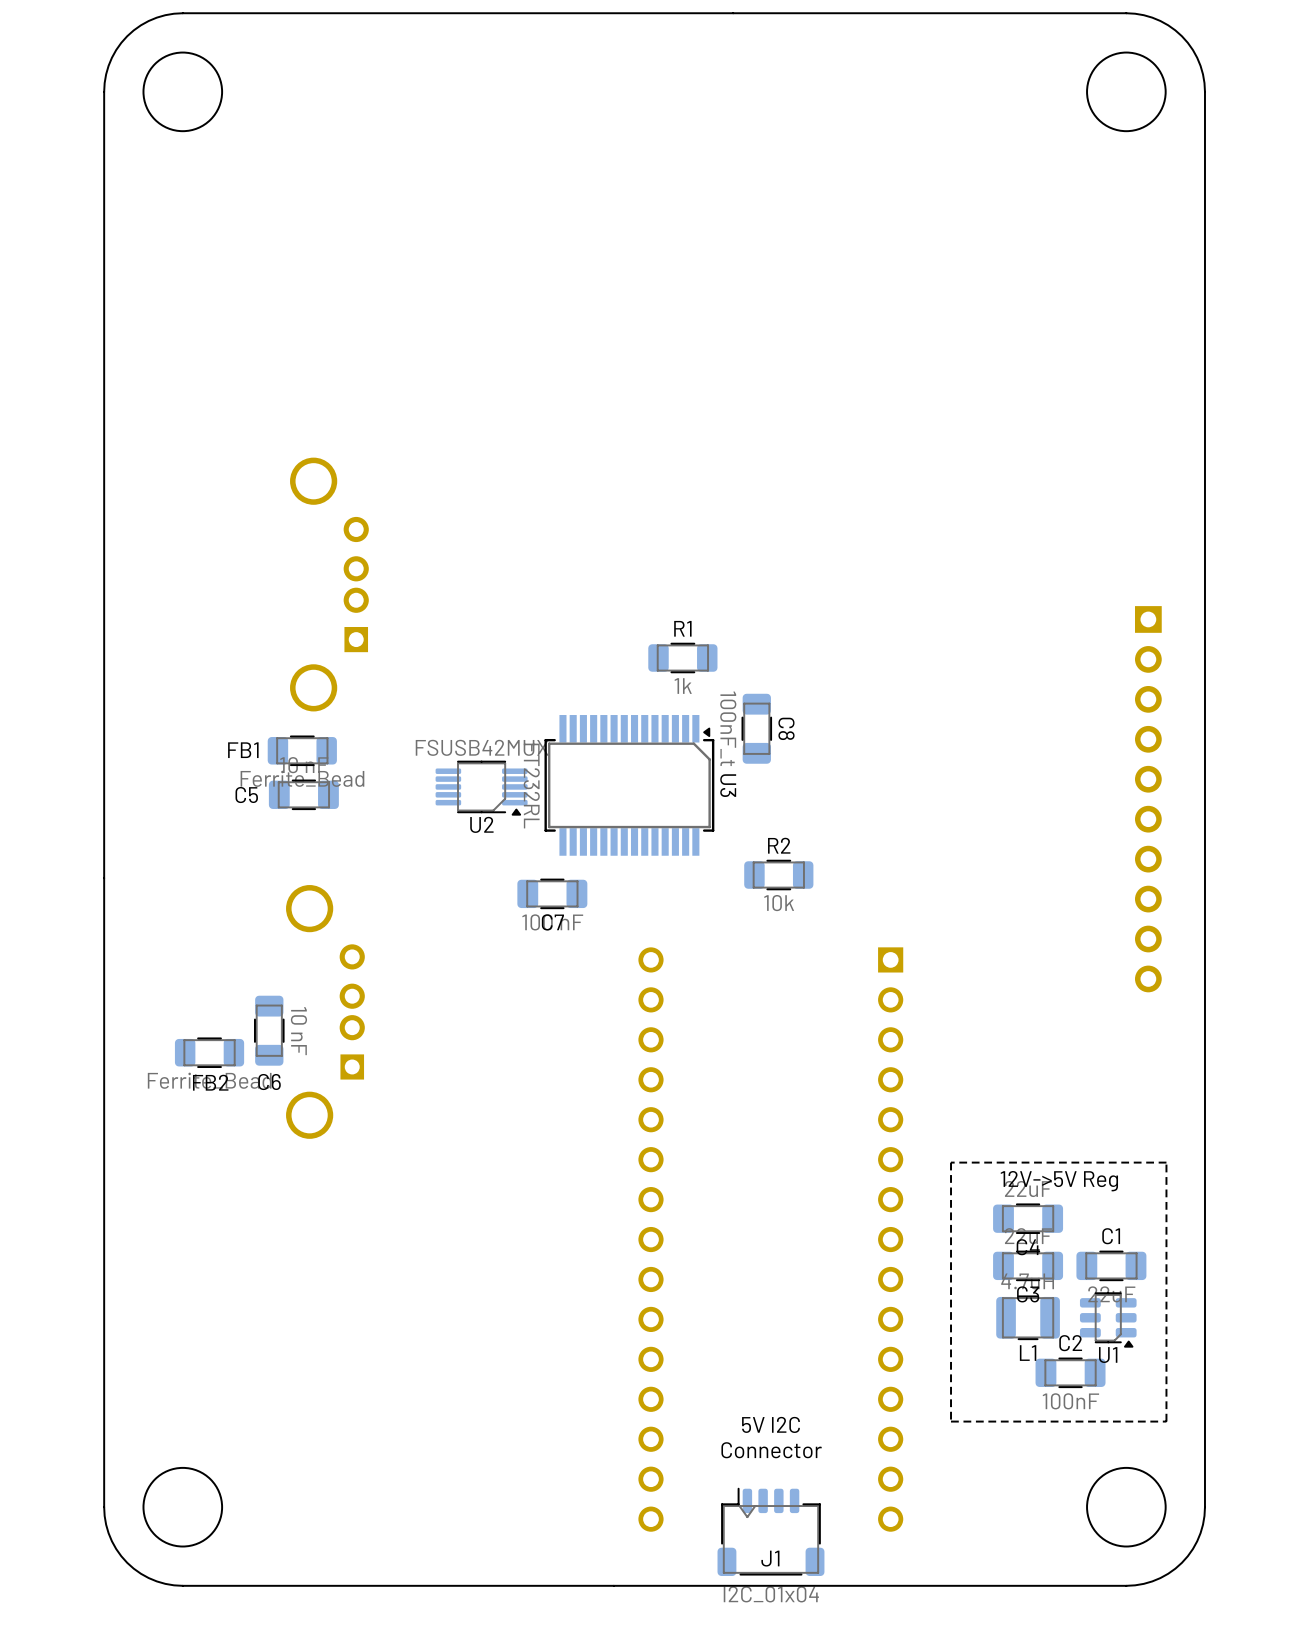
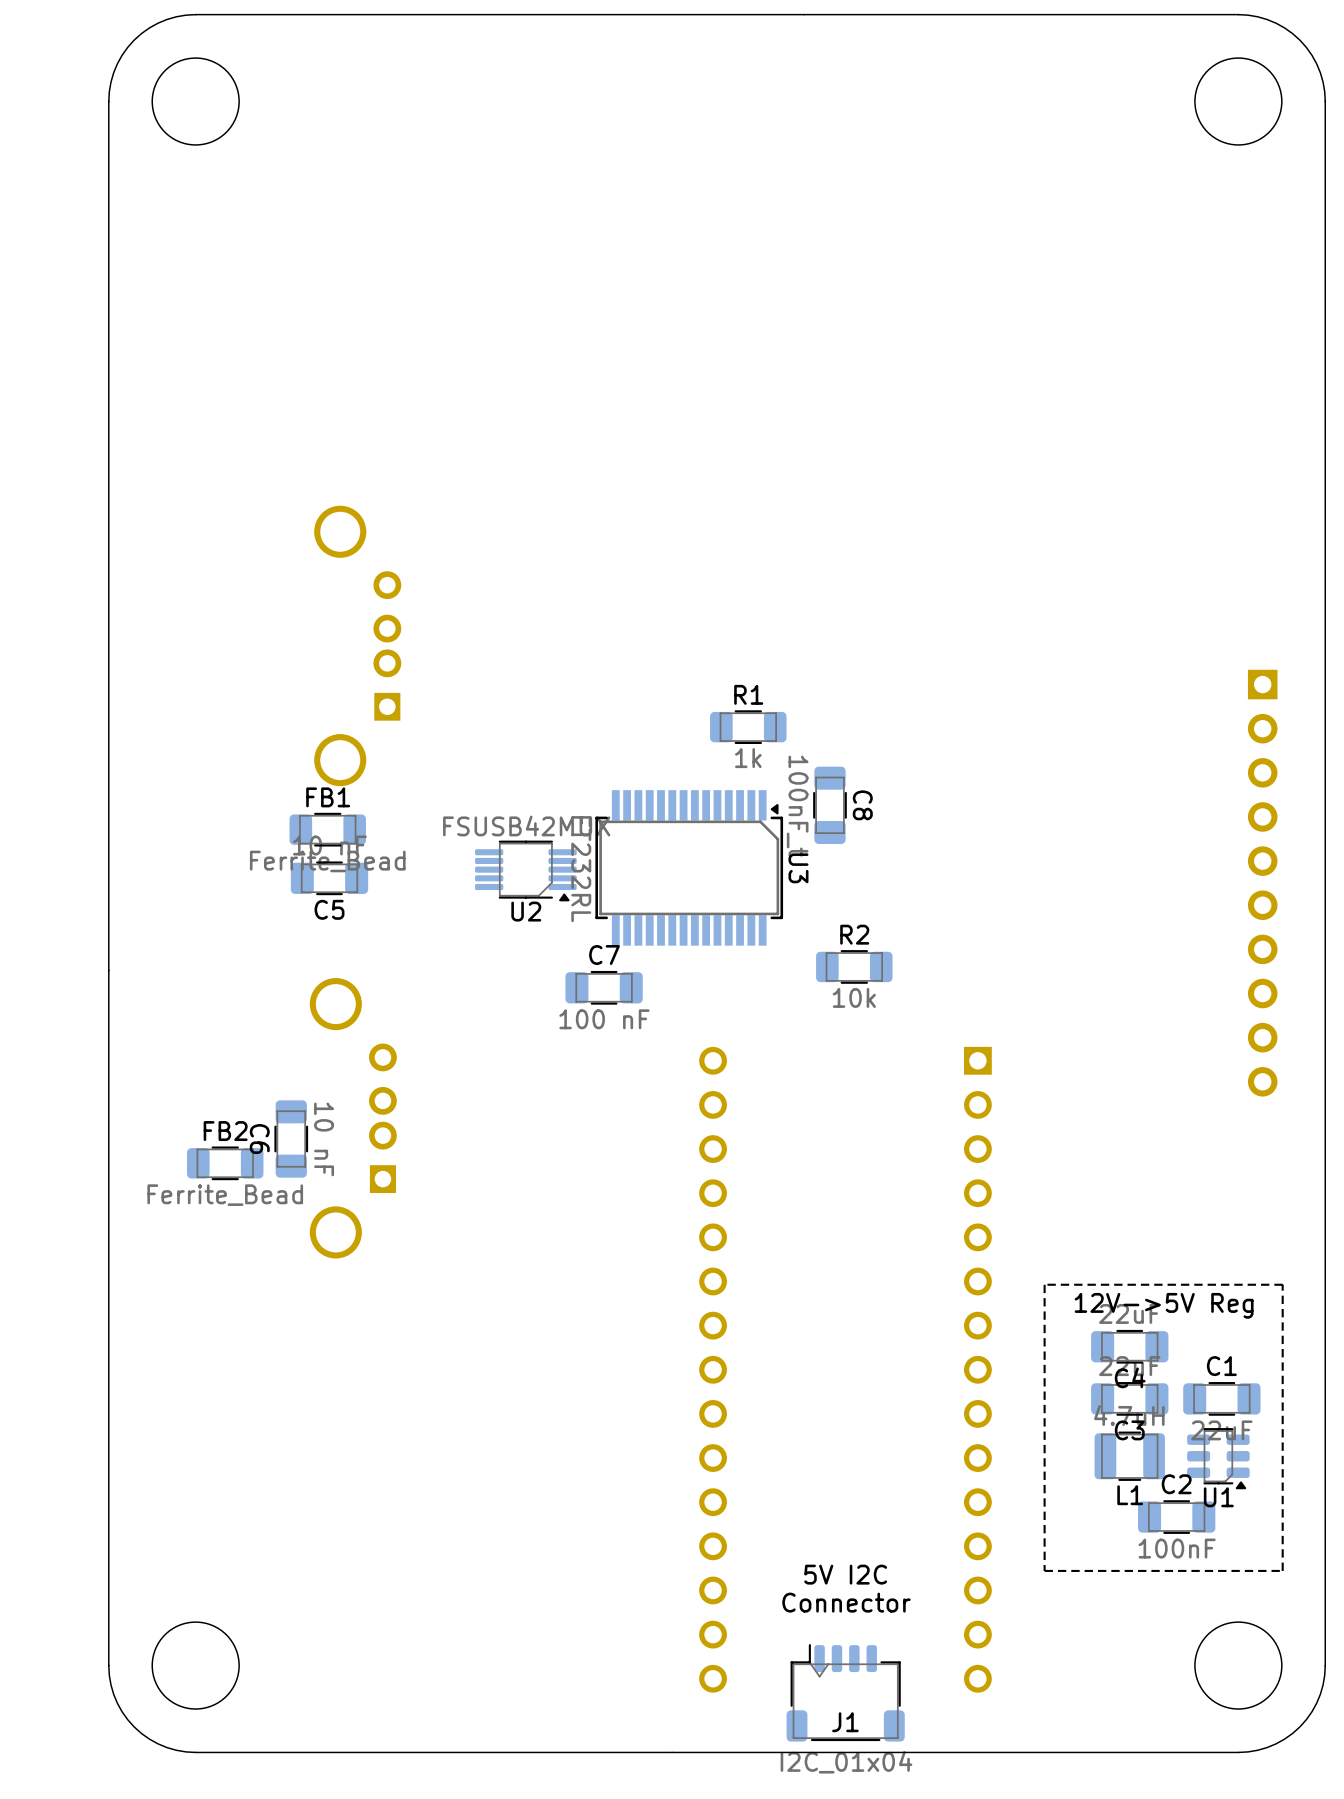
FB1 name position: FB1 (243, 750) -> FB1 (328, 797)
C5 name position: C5 (246, 795) -> C5 (329, 909)
C7 name position: C7 (552, 922) -> C7 (604, 955)
FB2 name position: FB2 (210, 1082) -> FB2 (225, 1131)
C6 name rotation: 0° (269, 1082) -> 90° clockwise (259, 1139)
C6 name position: C6 (269, 1082) -> C6 (259, 1139)

